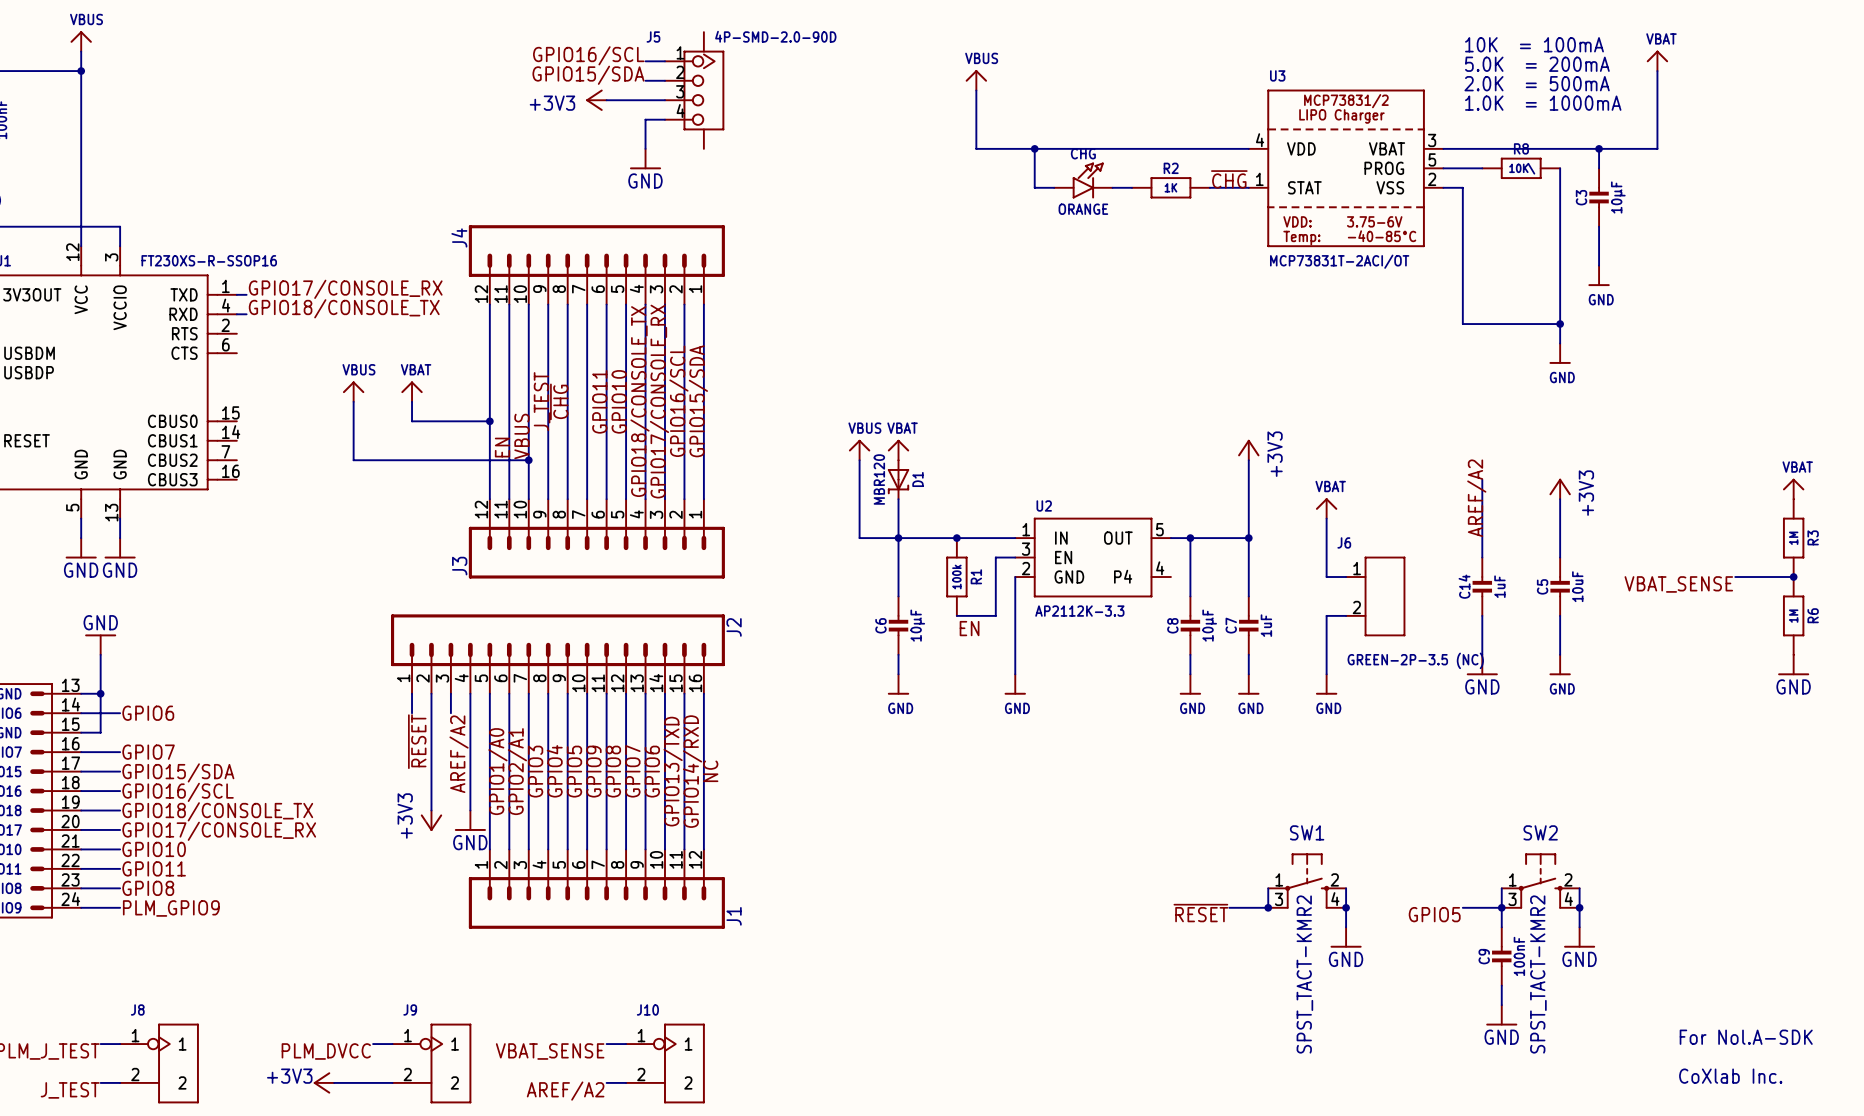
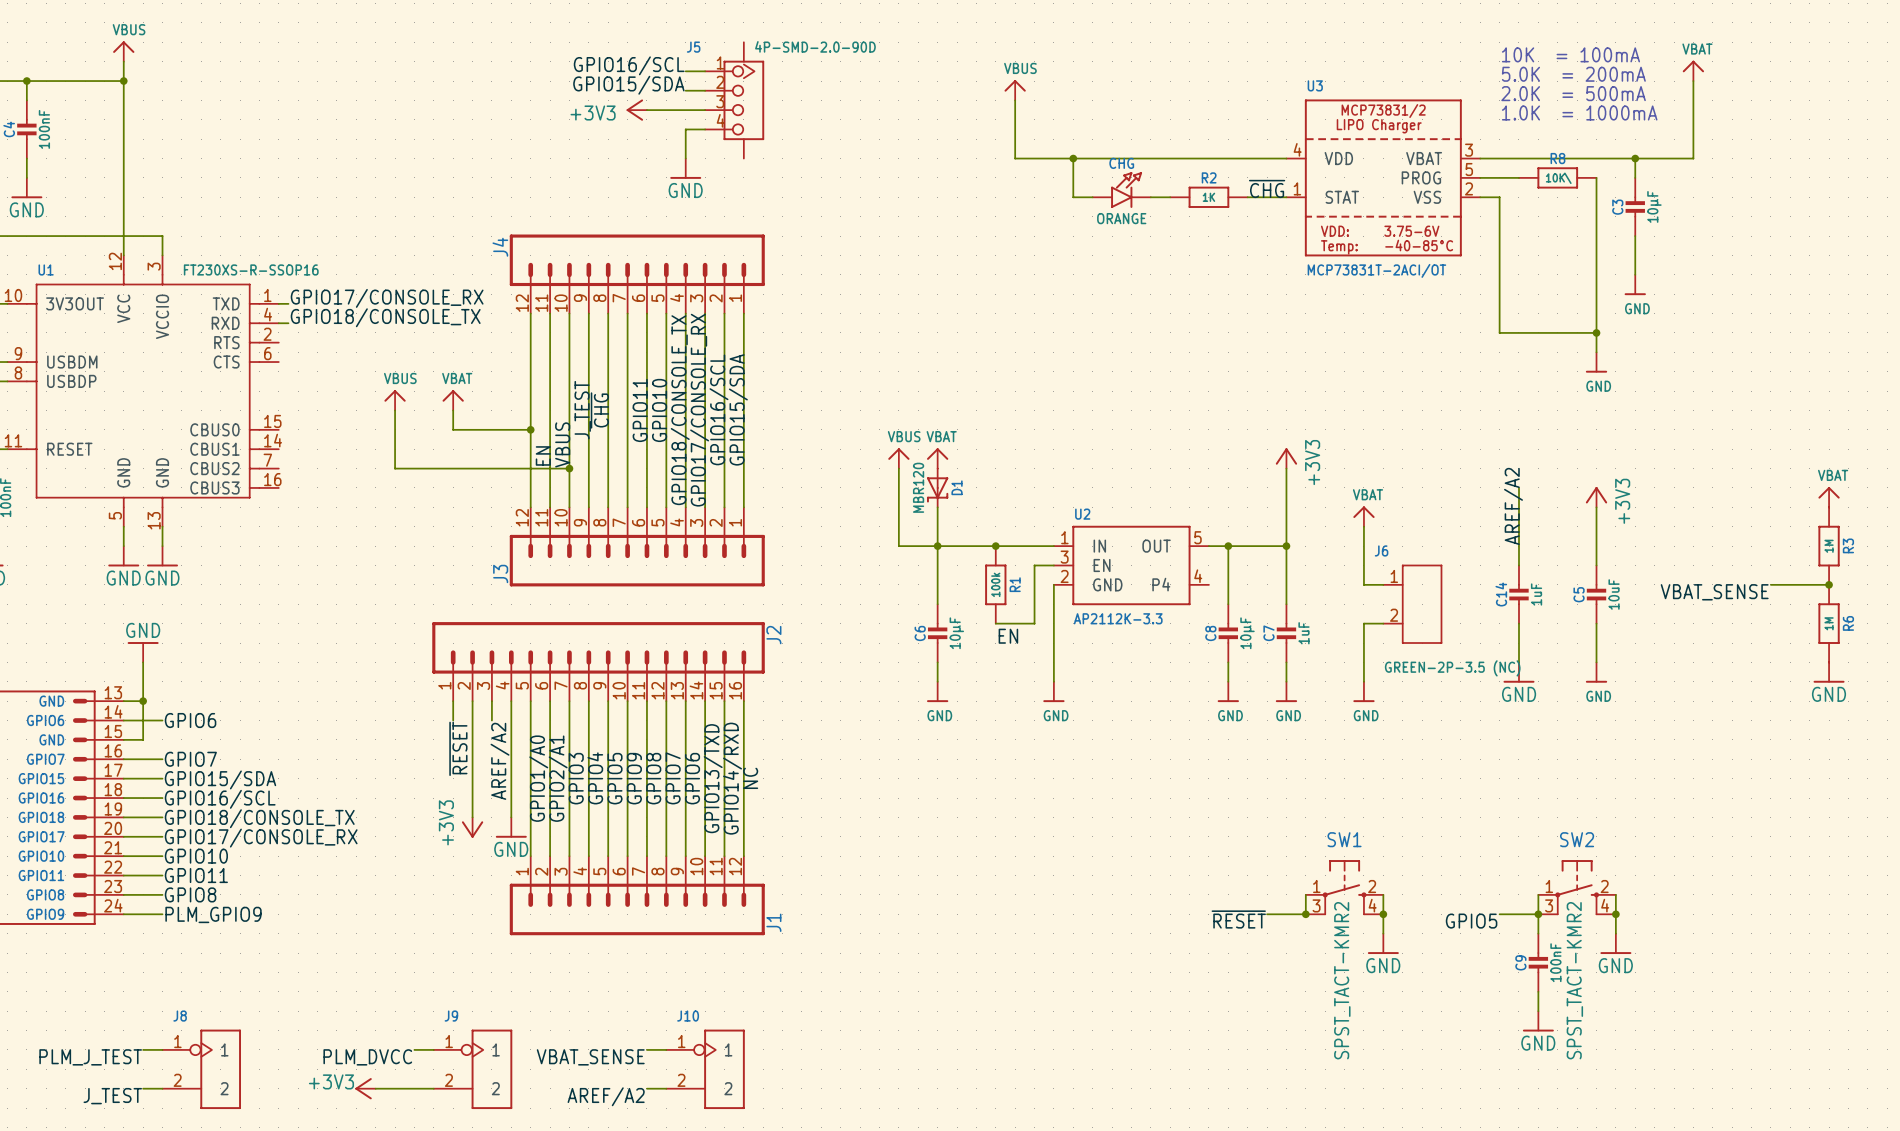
part: (1746, 1037) -> none
part: (1730, 1076) -> none

